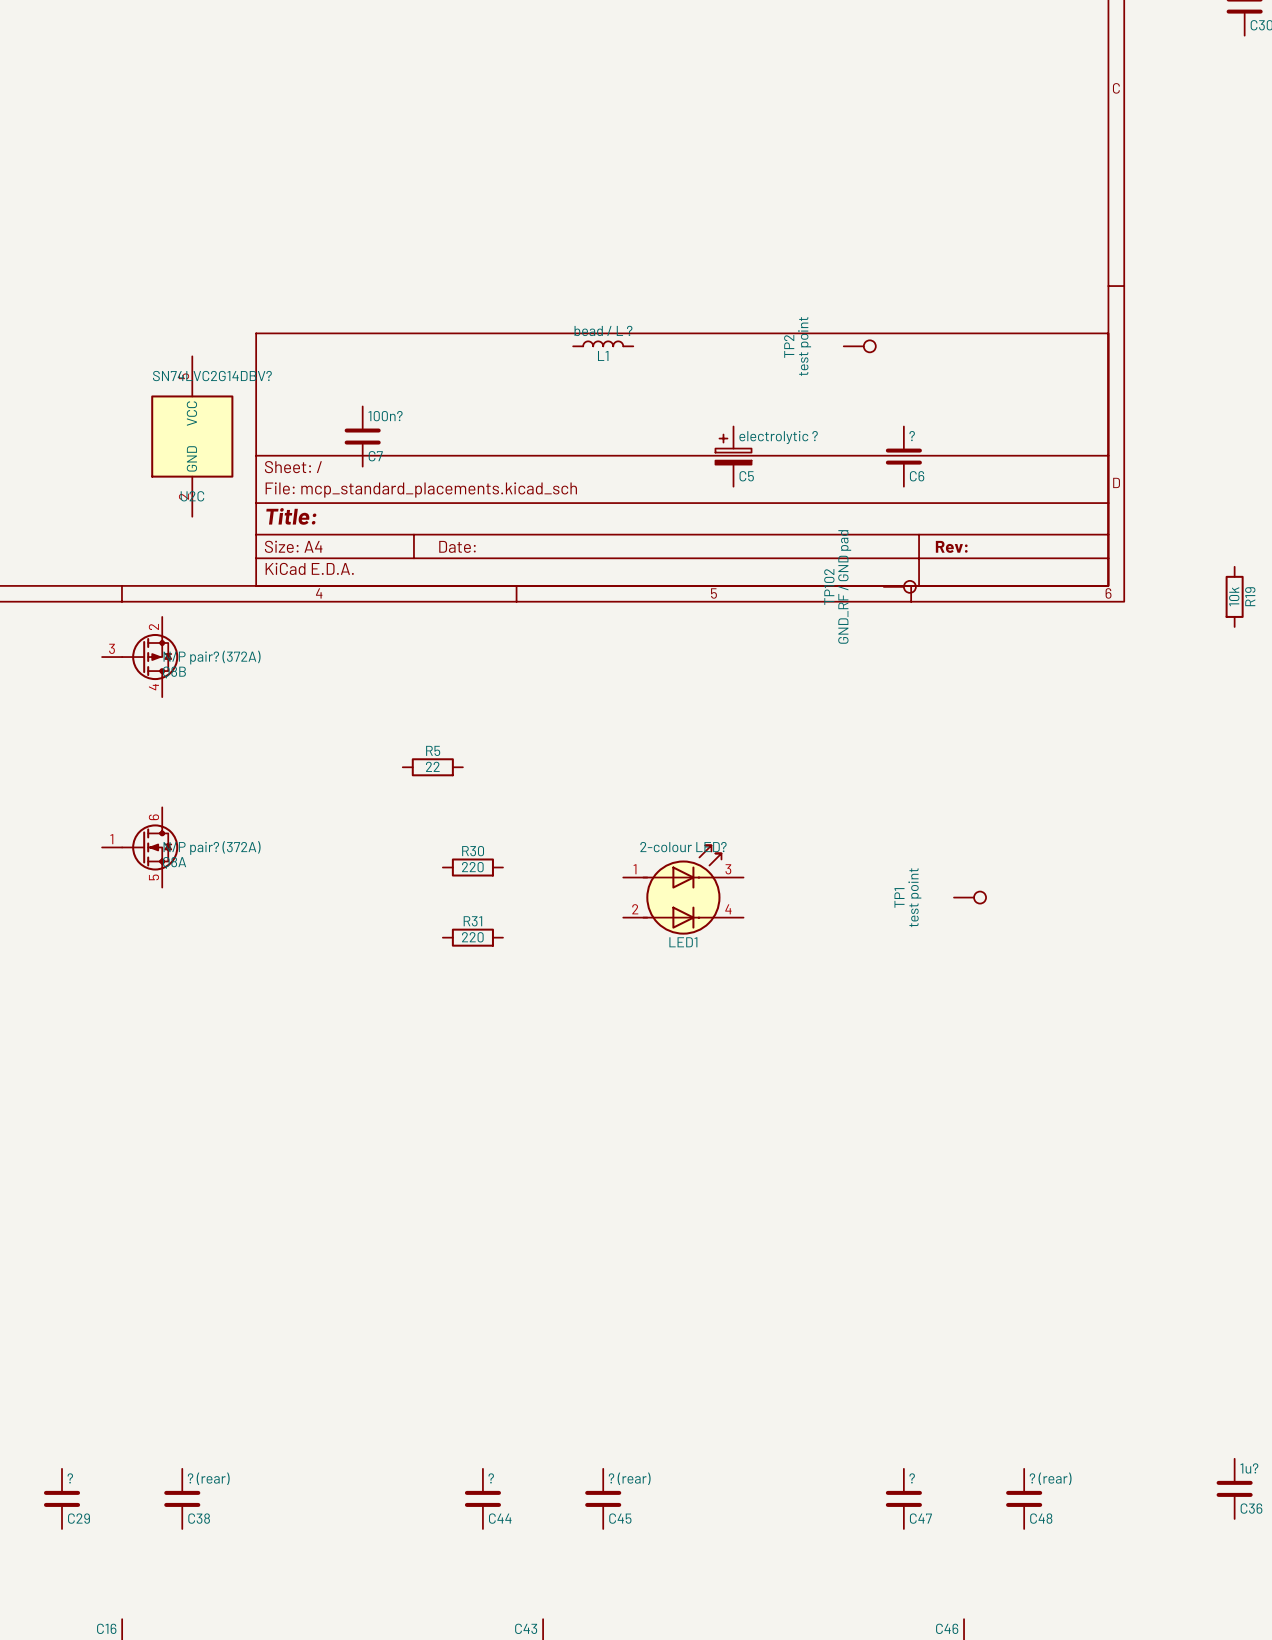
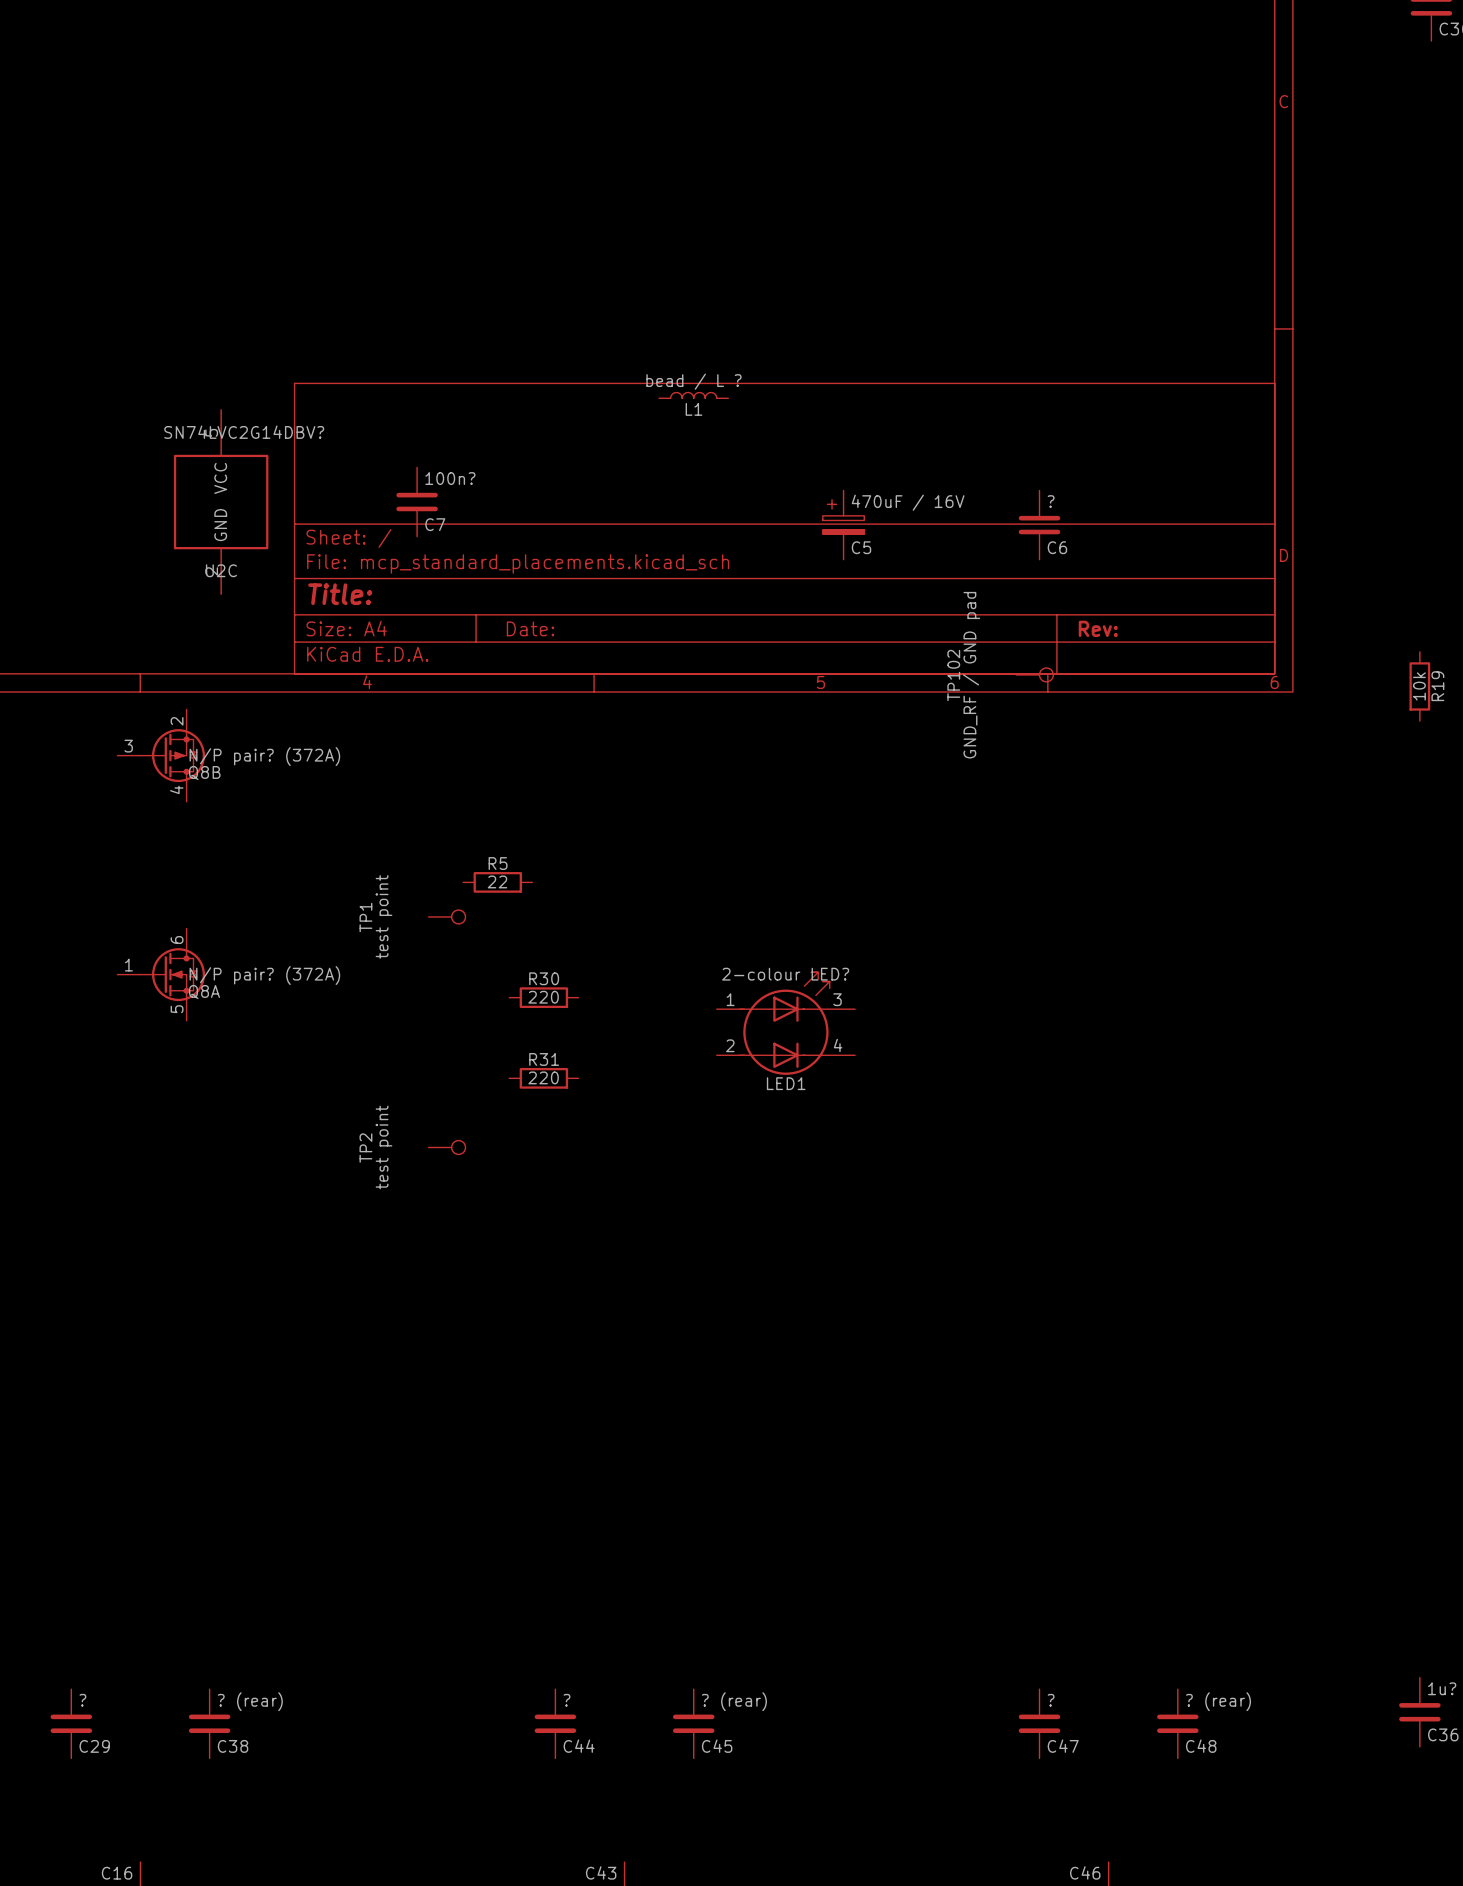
TP2 position: (859, 346) -> (447, 1147)
C5 value: electrolytic ? (778, 437) -> 470uF / 16V (908, 502)
TP1 position: (970, 897) -> (447, 916)

